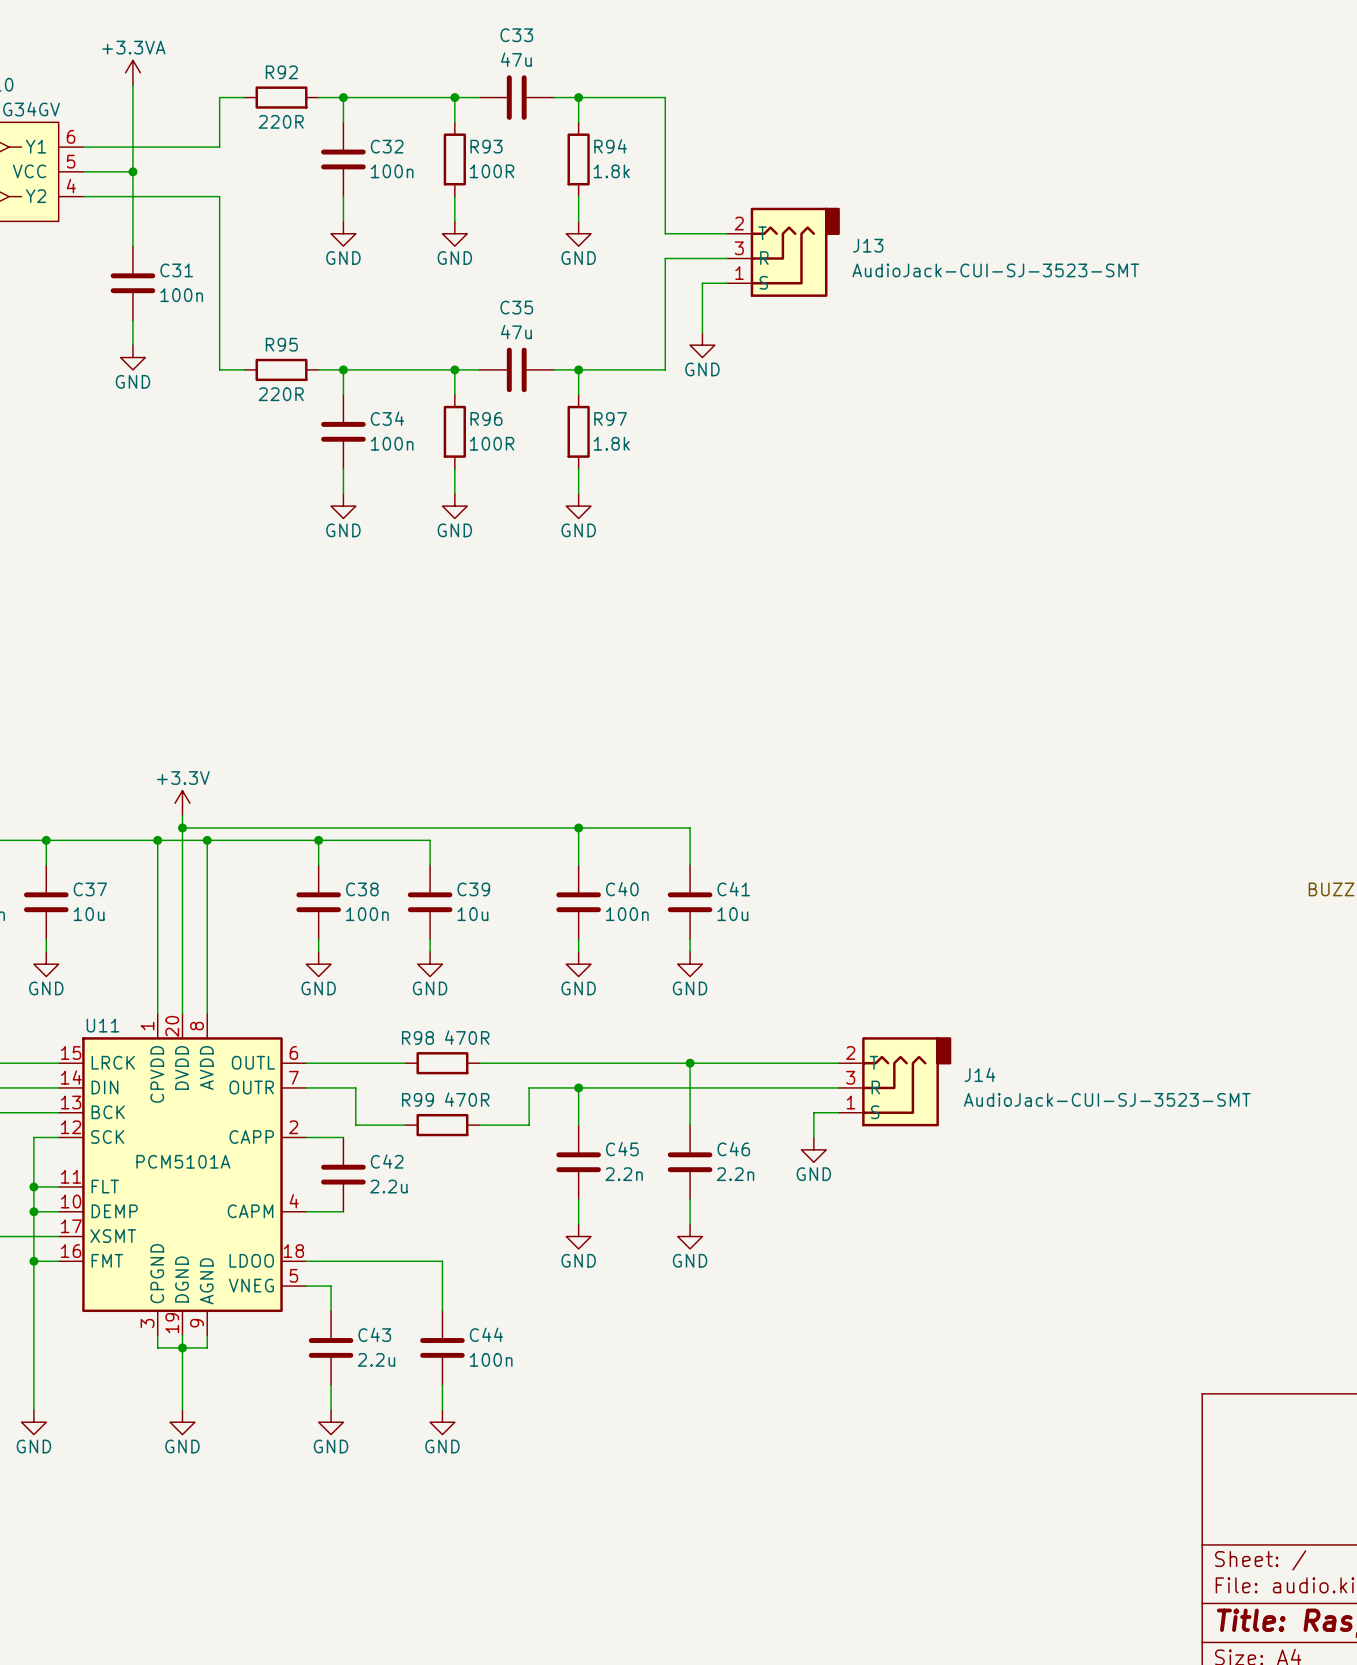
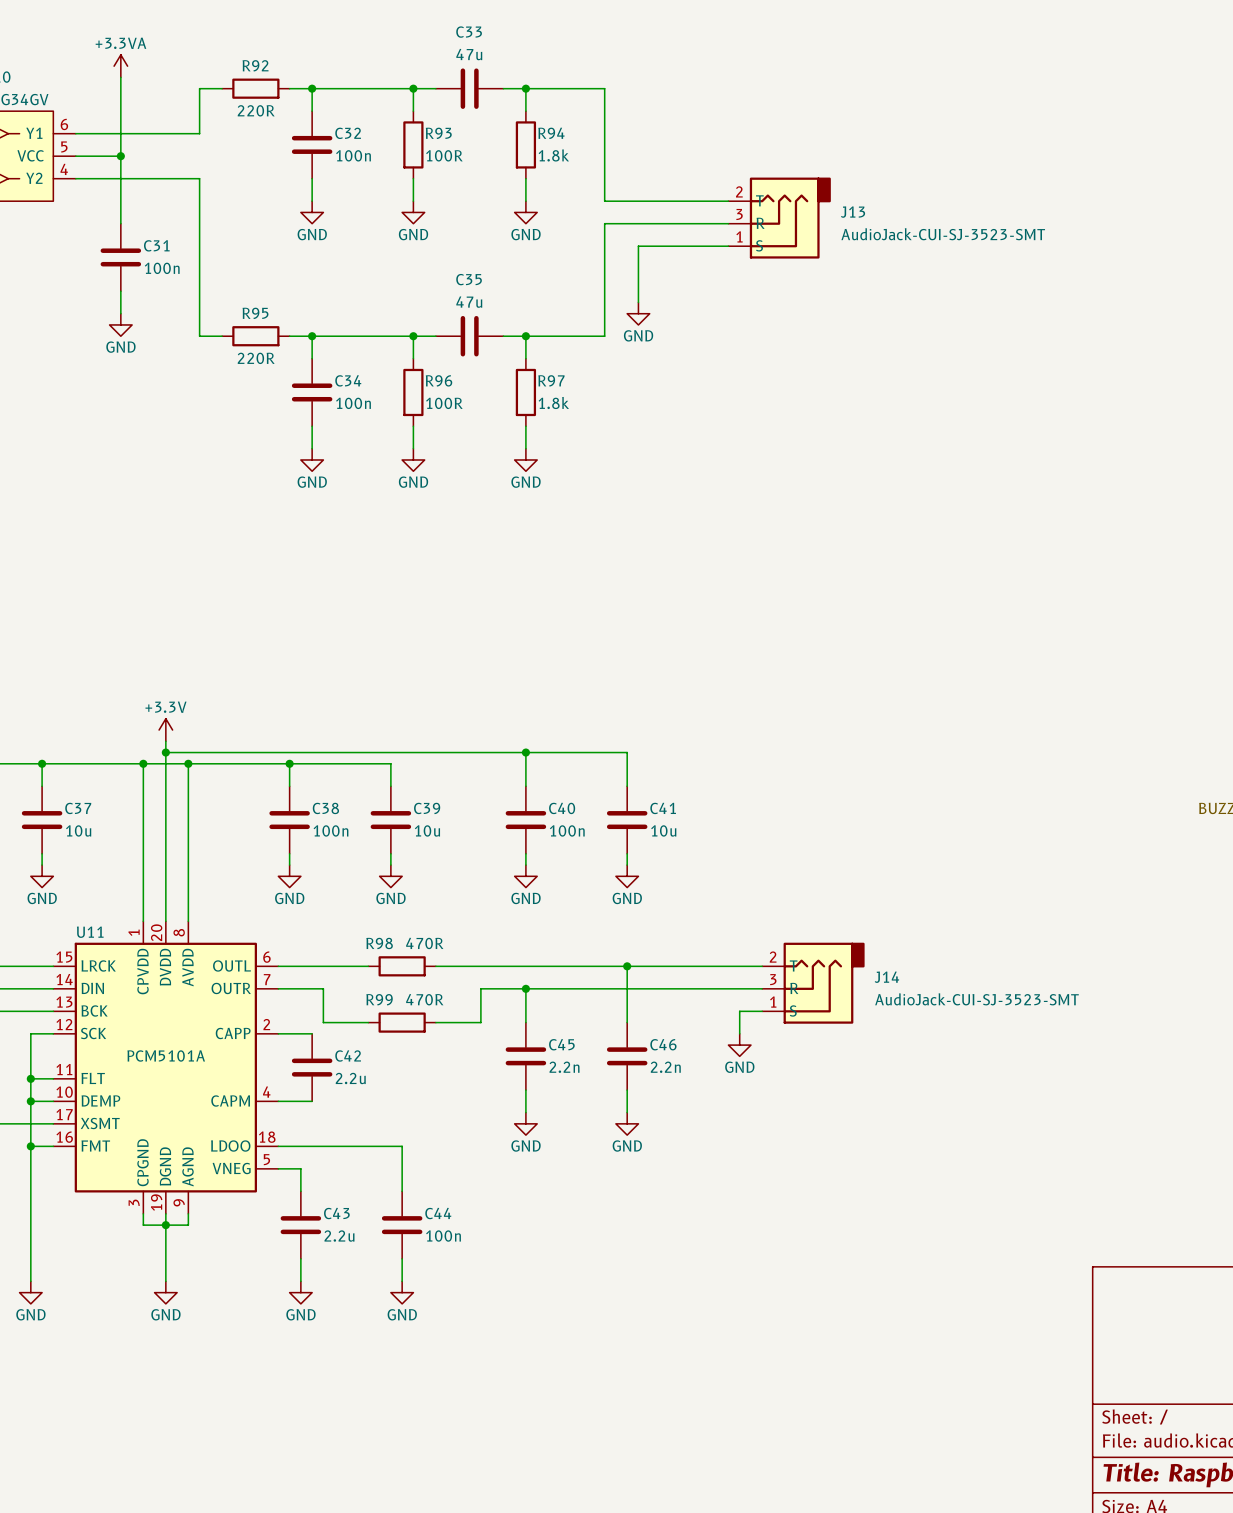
wire: (665, 221) (665, 233) (727, 233) -> (604, 201) (728, 201)
J13 position: (783, 252) -> (779, 218)
wire: (665, 258) (727, 258) -> (604, 234) (604, 223) (728, 223)
wire: (702, 283) (727, 283) -> (638, 257) (638, 246) (728, 246)

